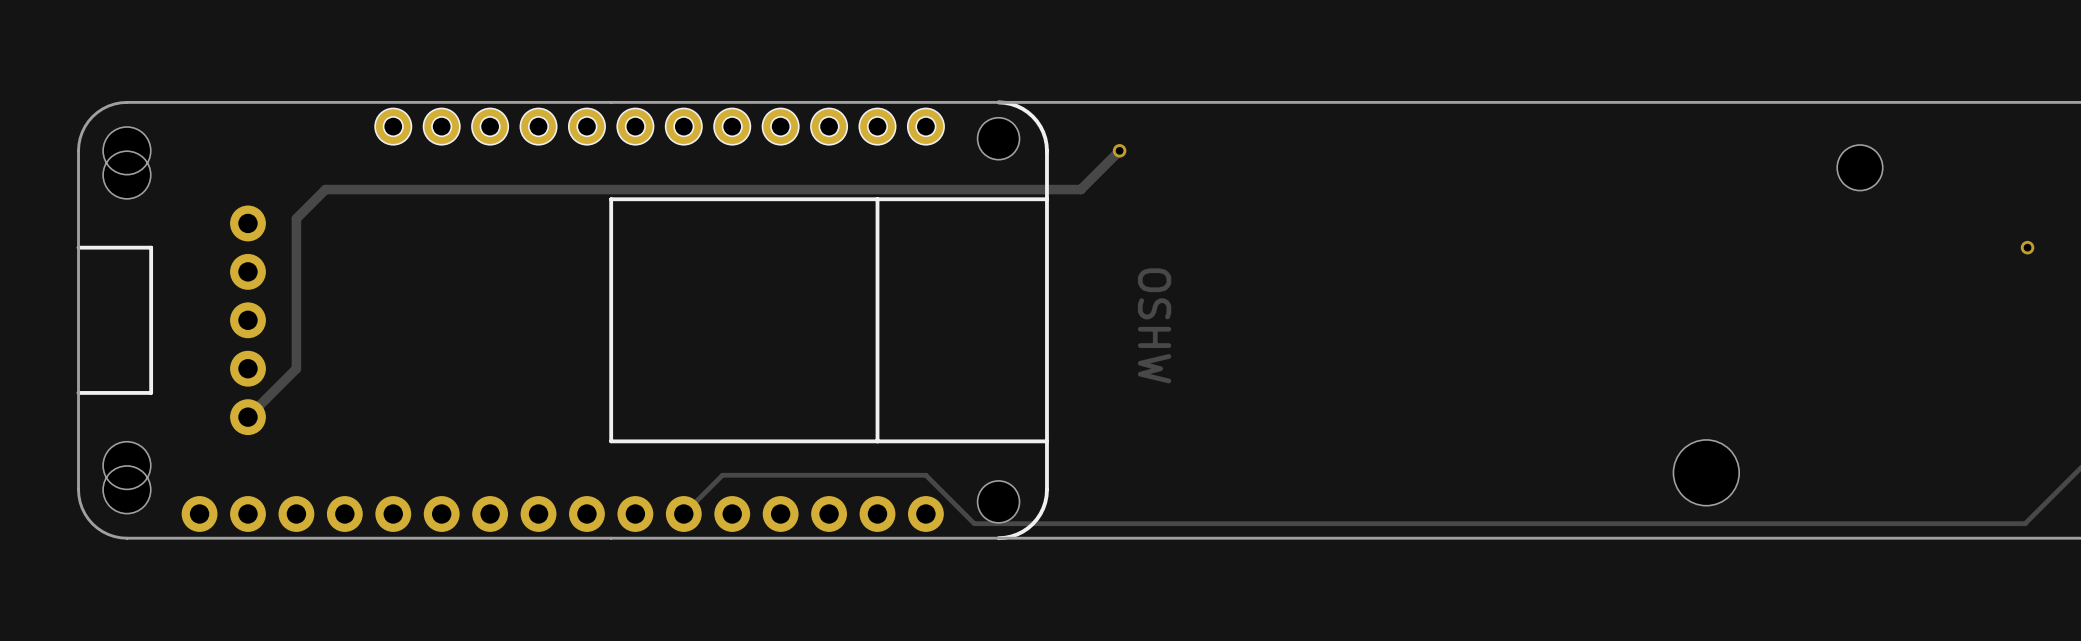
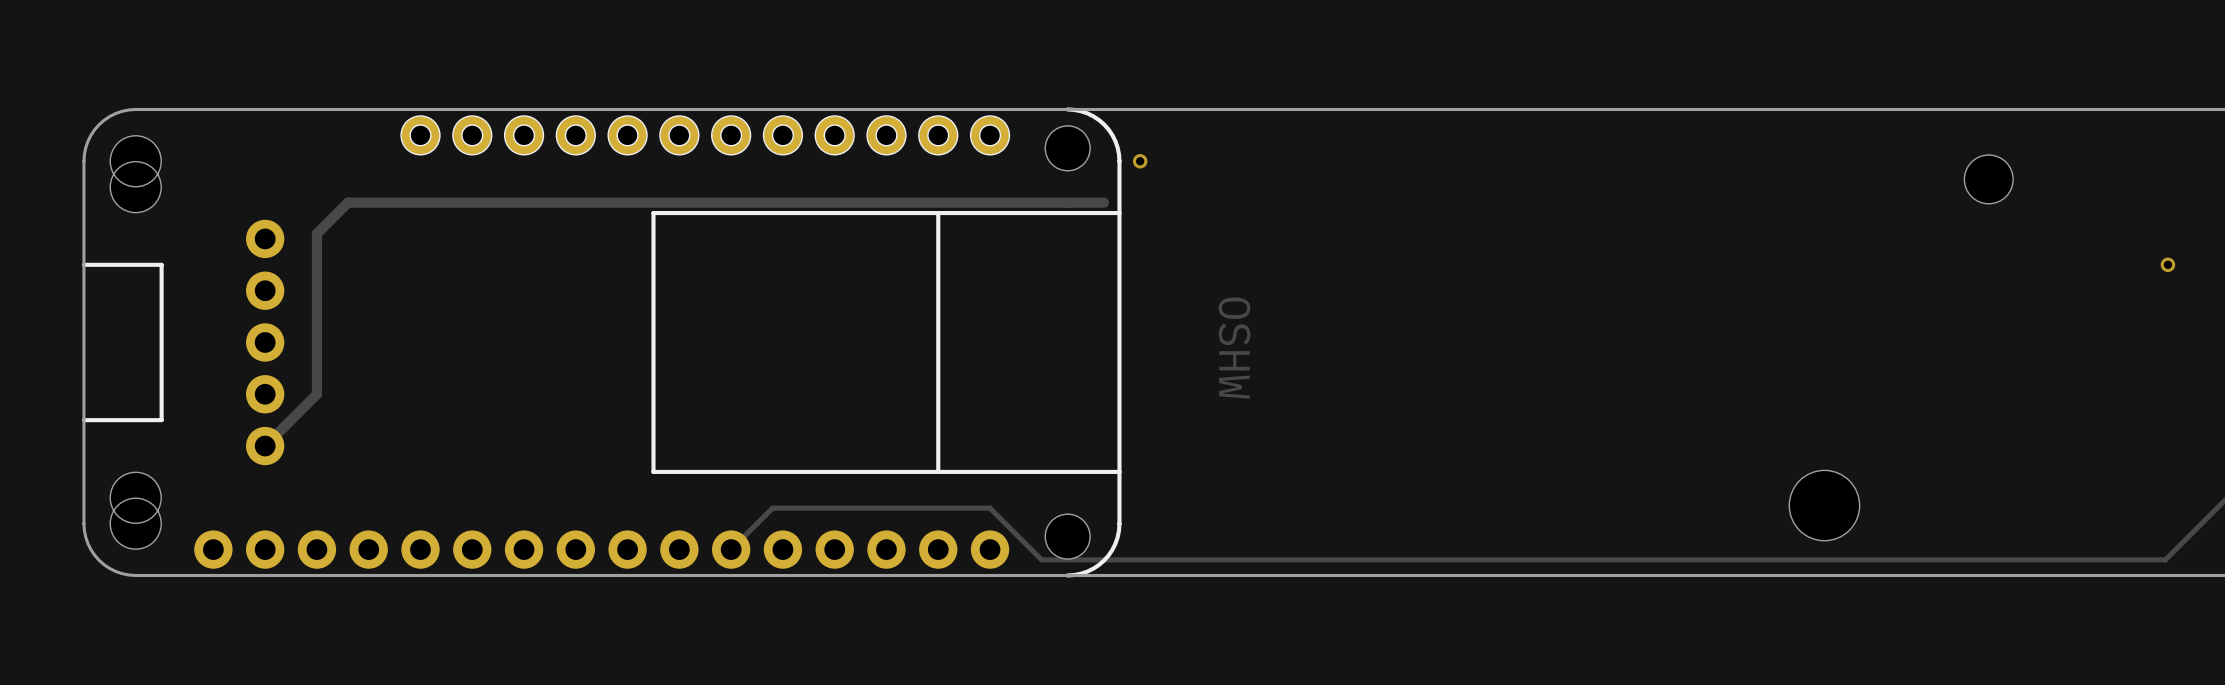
track: (1119, 150) (1080, 189) (1032, 189) -> none
via position: (1119, 150) -> (1140, 161)

